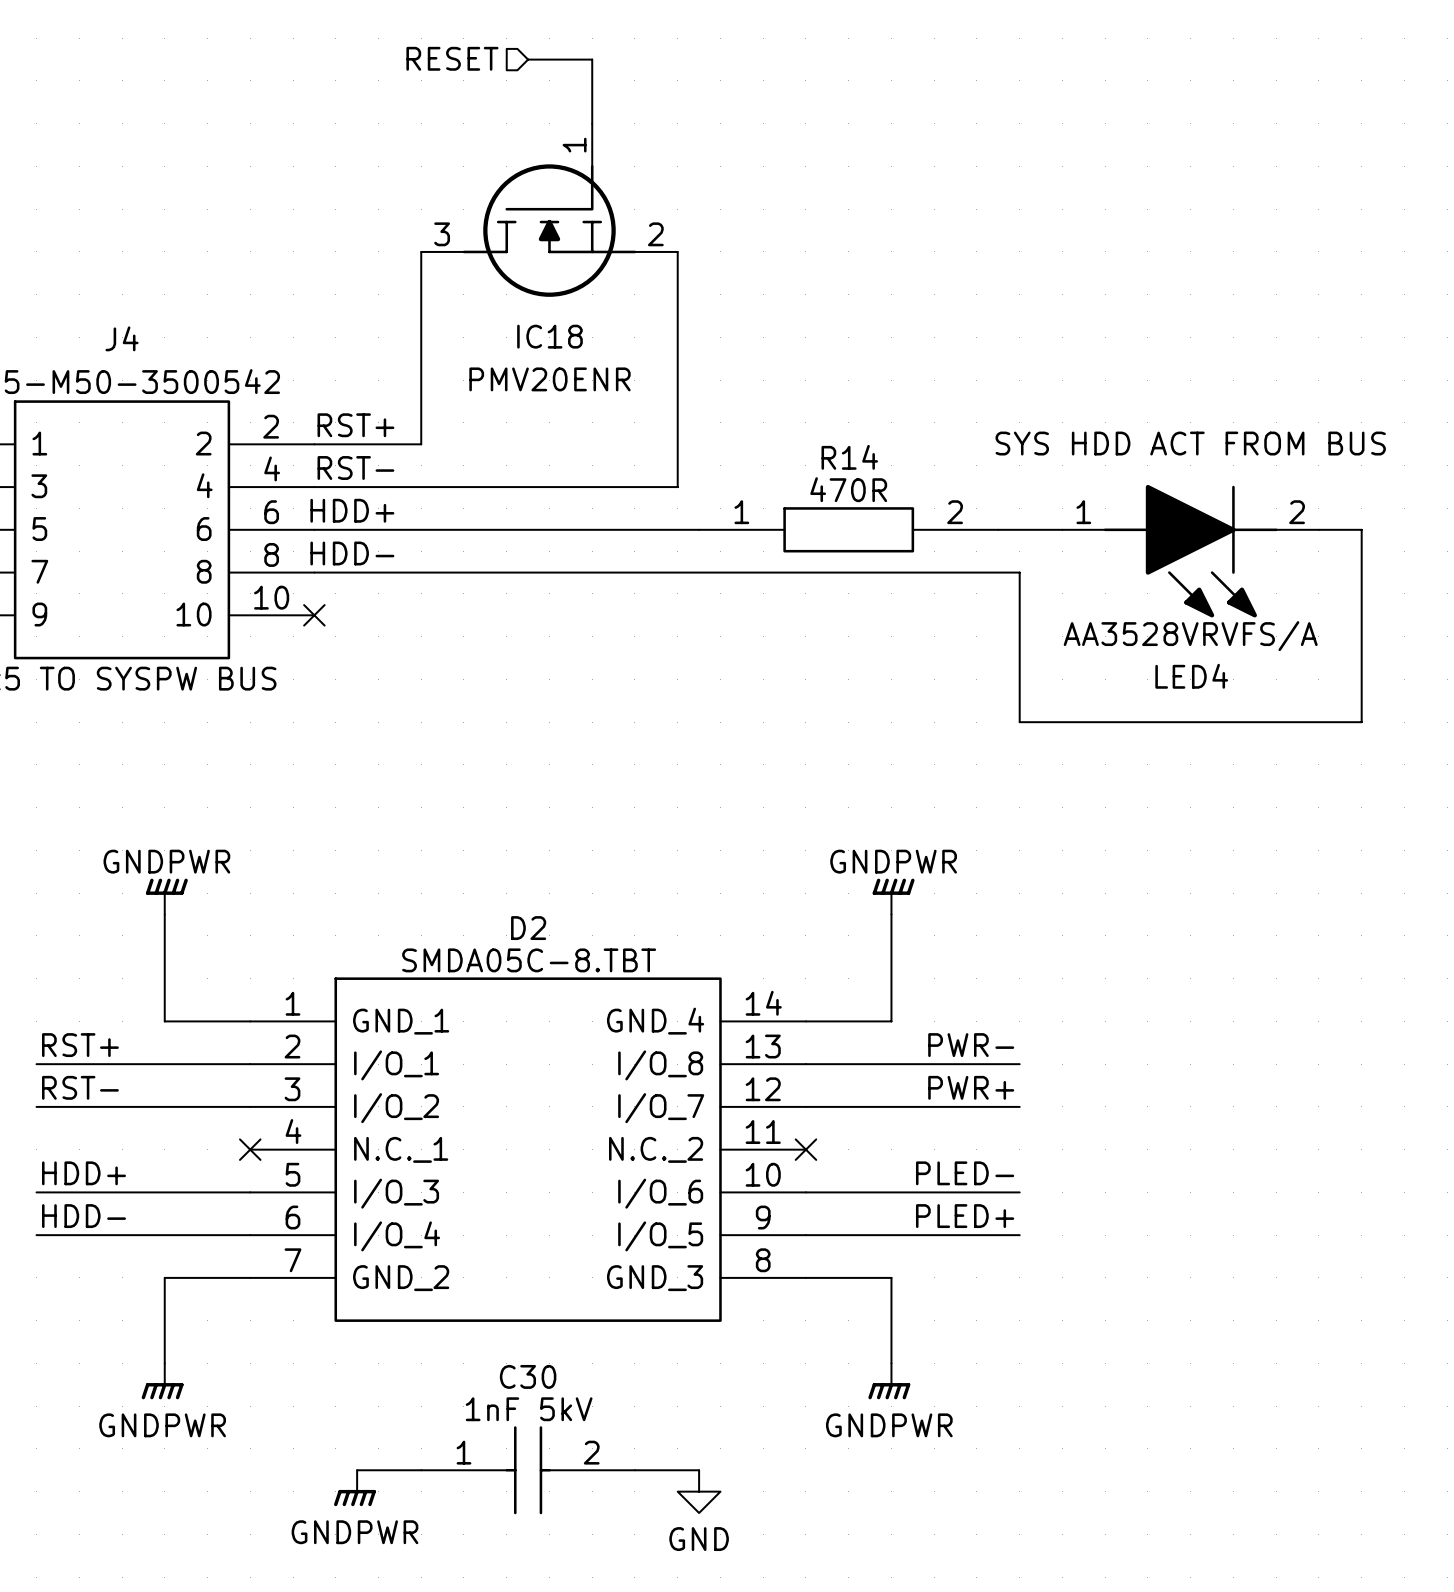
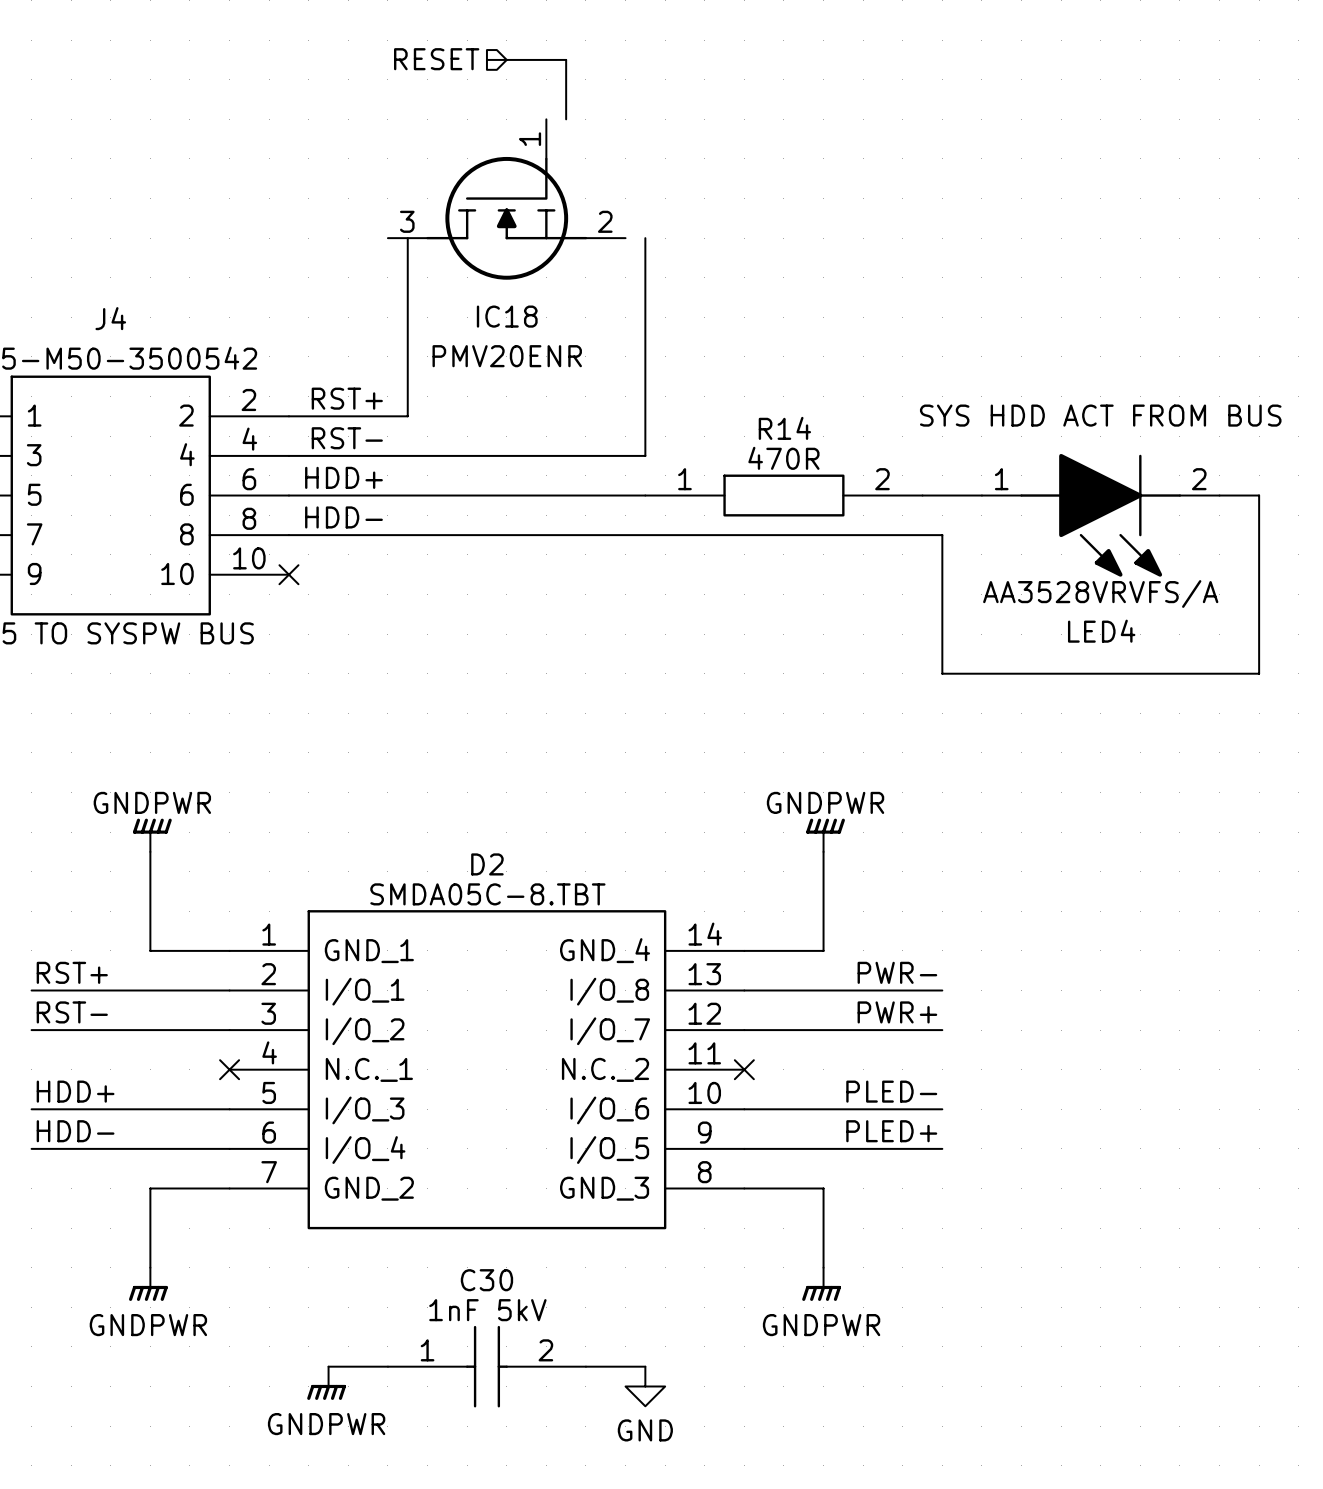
hierarchical label position: RESET (452, 58) -> RESET (436, 59)
wire: (592, 59) (592, 123) -> (546, 59) (566, 59) (566, 119)
wire: (421, 251) (421, 444) -> (407, 238) (407, 416) (387, 416)
wire: (677, 251) (677, 487) -> (645, 238) (645, 455) (625, 455)
label position: RST+ (355, 425) -> RST+ (347, 398)
label position: RST- (355, 468) -> RST- (347, 438)
label position: HDD+ (352, 510) -> HDD+ (343, 477)
label position: HDD- (352, 553) -> HDD- (343, 517)

